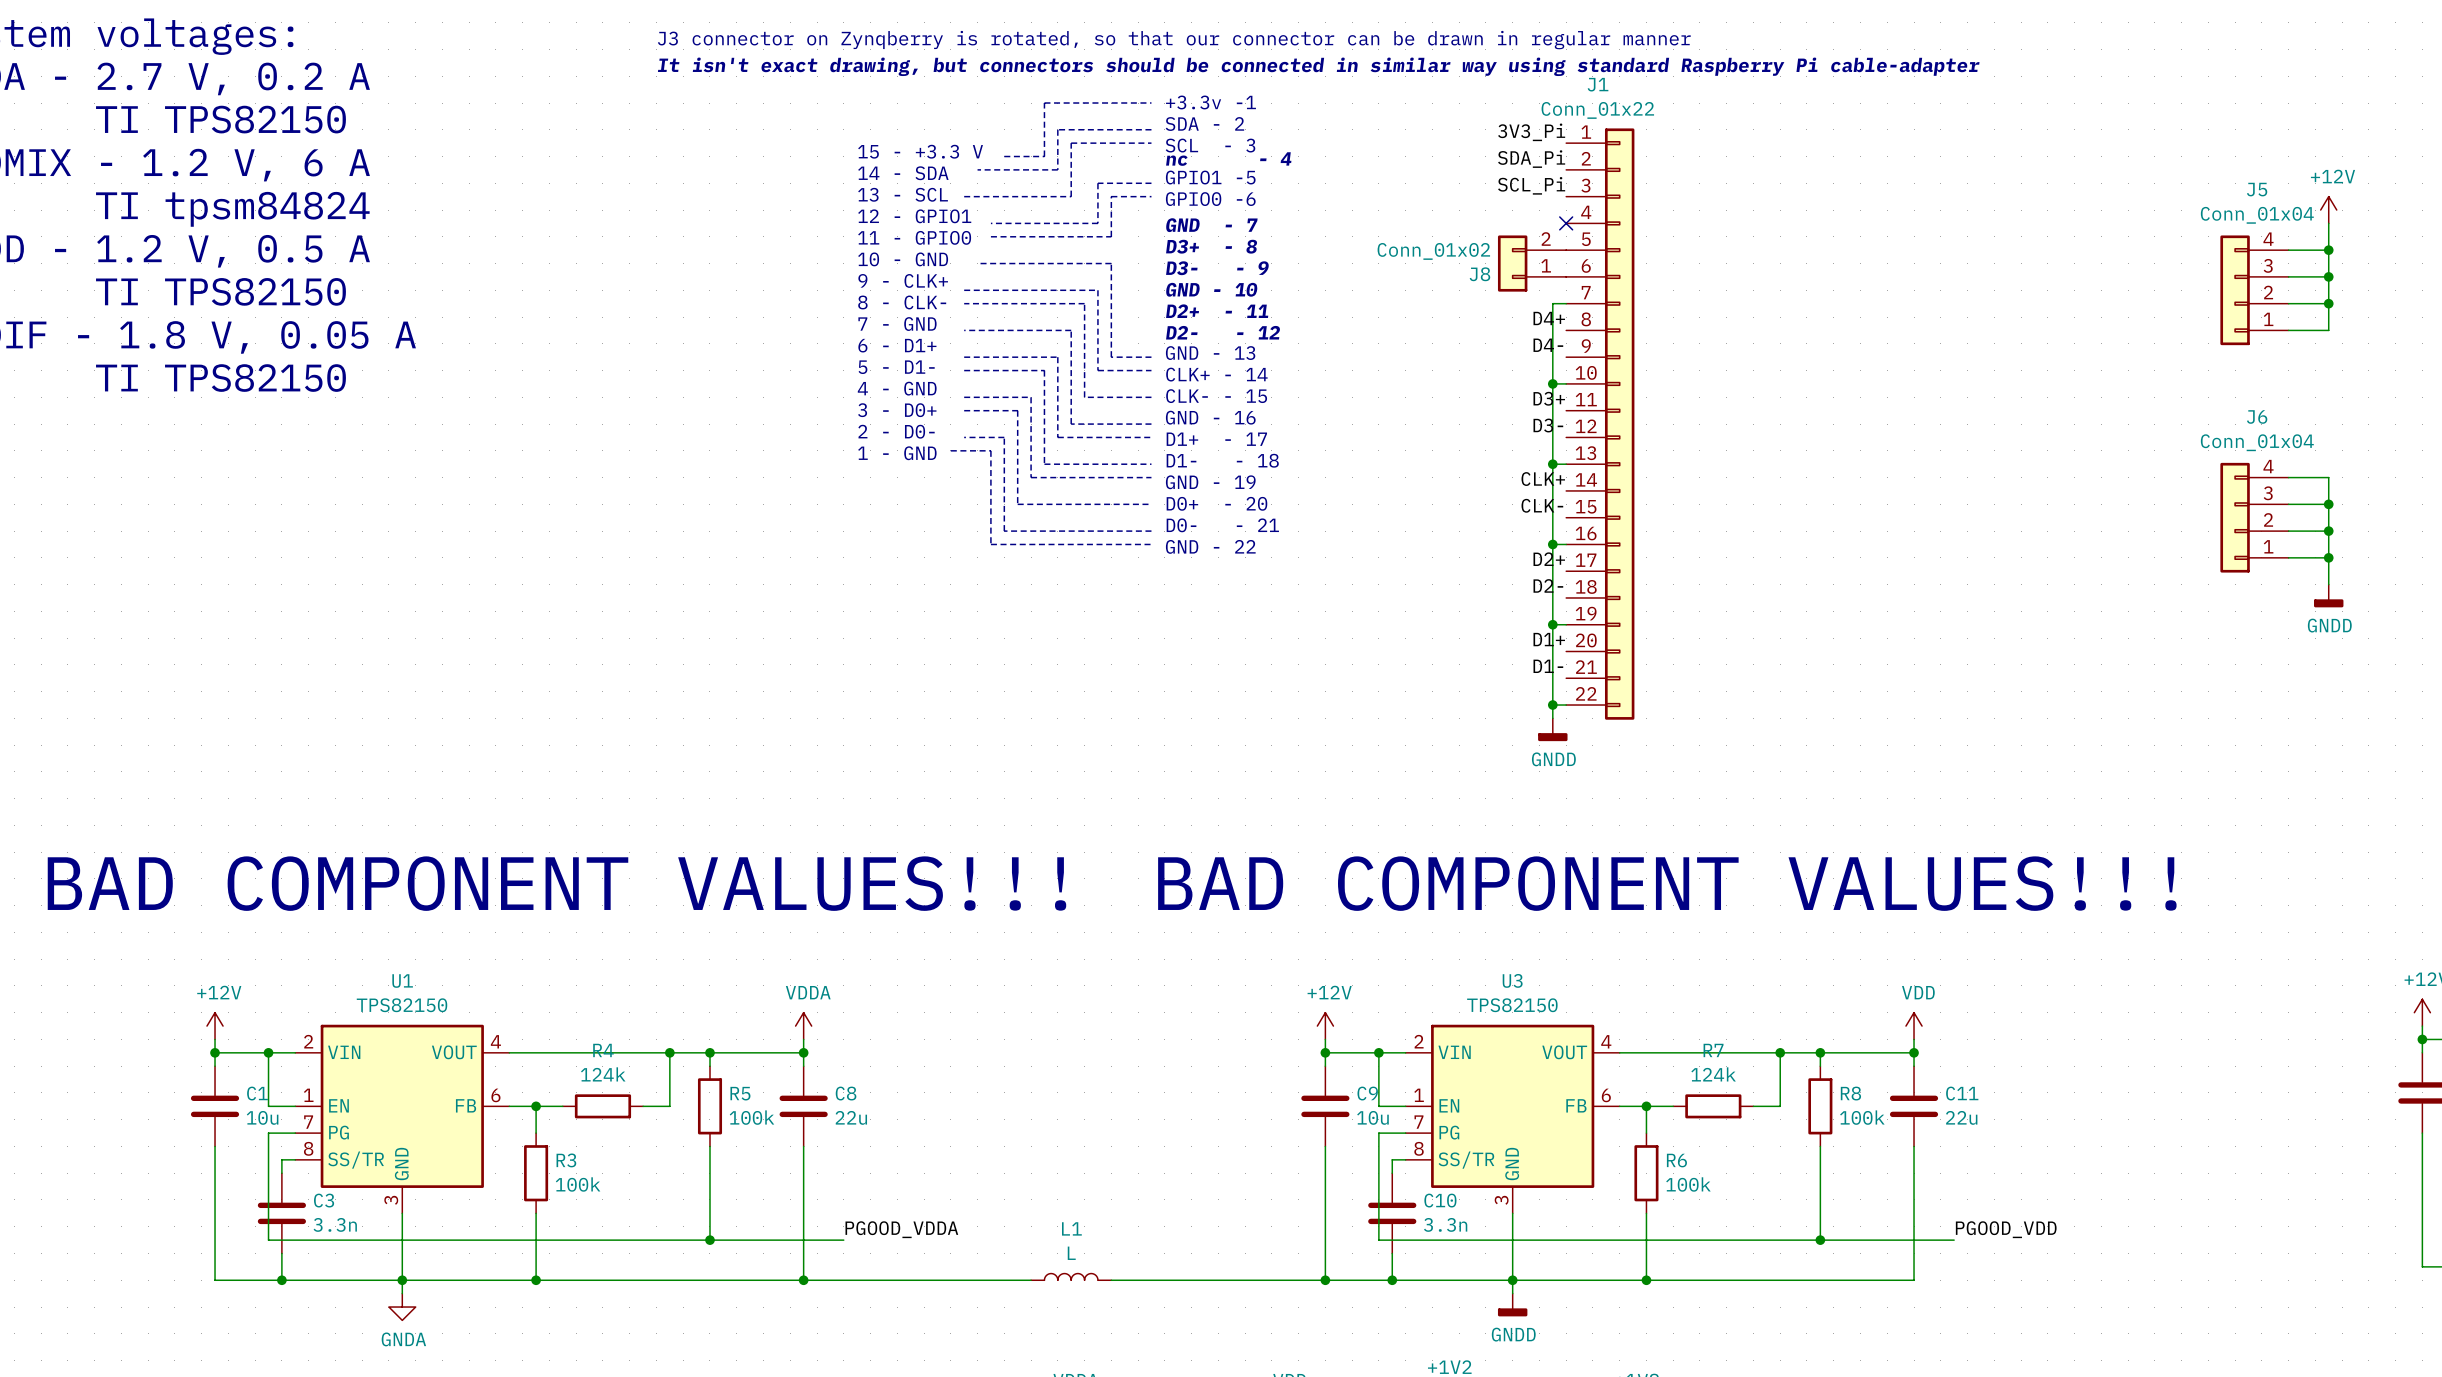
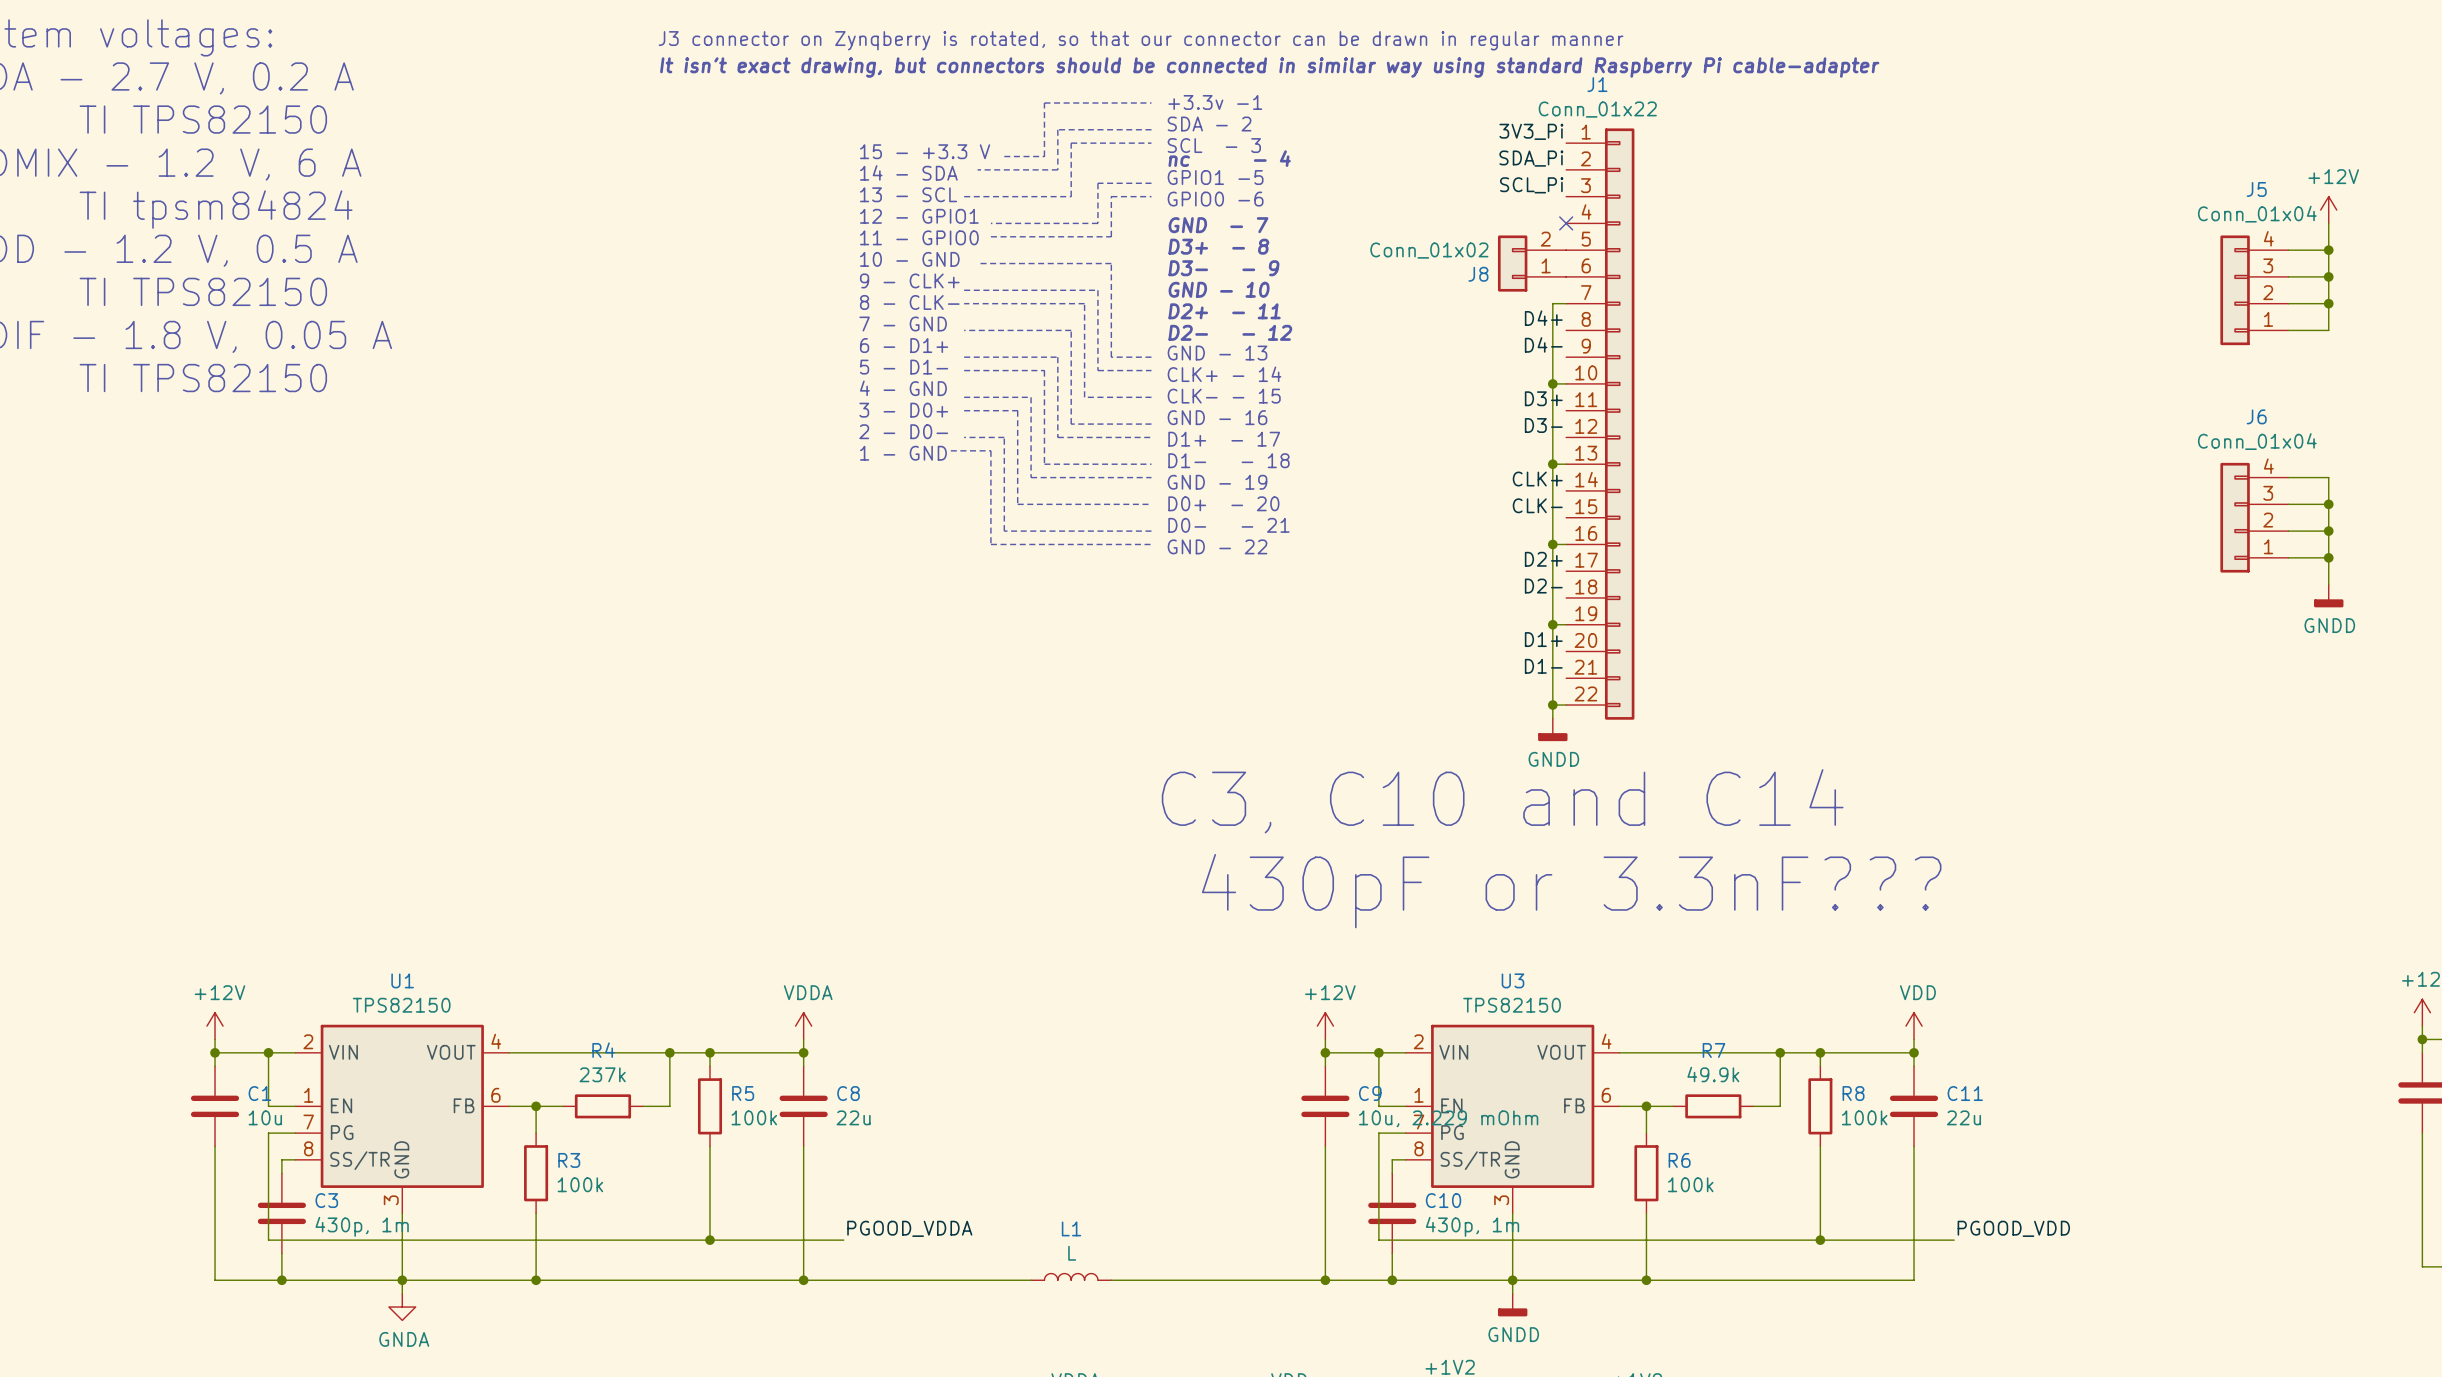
text: none -> C3, C10 and C14 (1502, 801)
text: BAD COMPONENT VALUES!!! (556, 883) -> none
text: BAD COMPONENT VALUES!!! (1667, 883) -> 430pF or 3.3nF??? (1571, 891)
R4 value: 124k (603, 1074) -> 237k (602, 1074)
R7 value: 124k (1713, 1074) -> 49.9k (1713, 1074)
C9 value: 10u (1372, 1117) -> 10u, 2.229 mOhm (1448, 1118)
C3 value: 3.3n (335, 1224) -> 430p, 1m (362, 1226)
C10 value: 3.3n (1445, 1224) -> 430p, 1m (1472, 1226)

